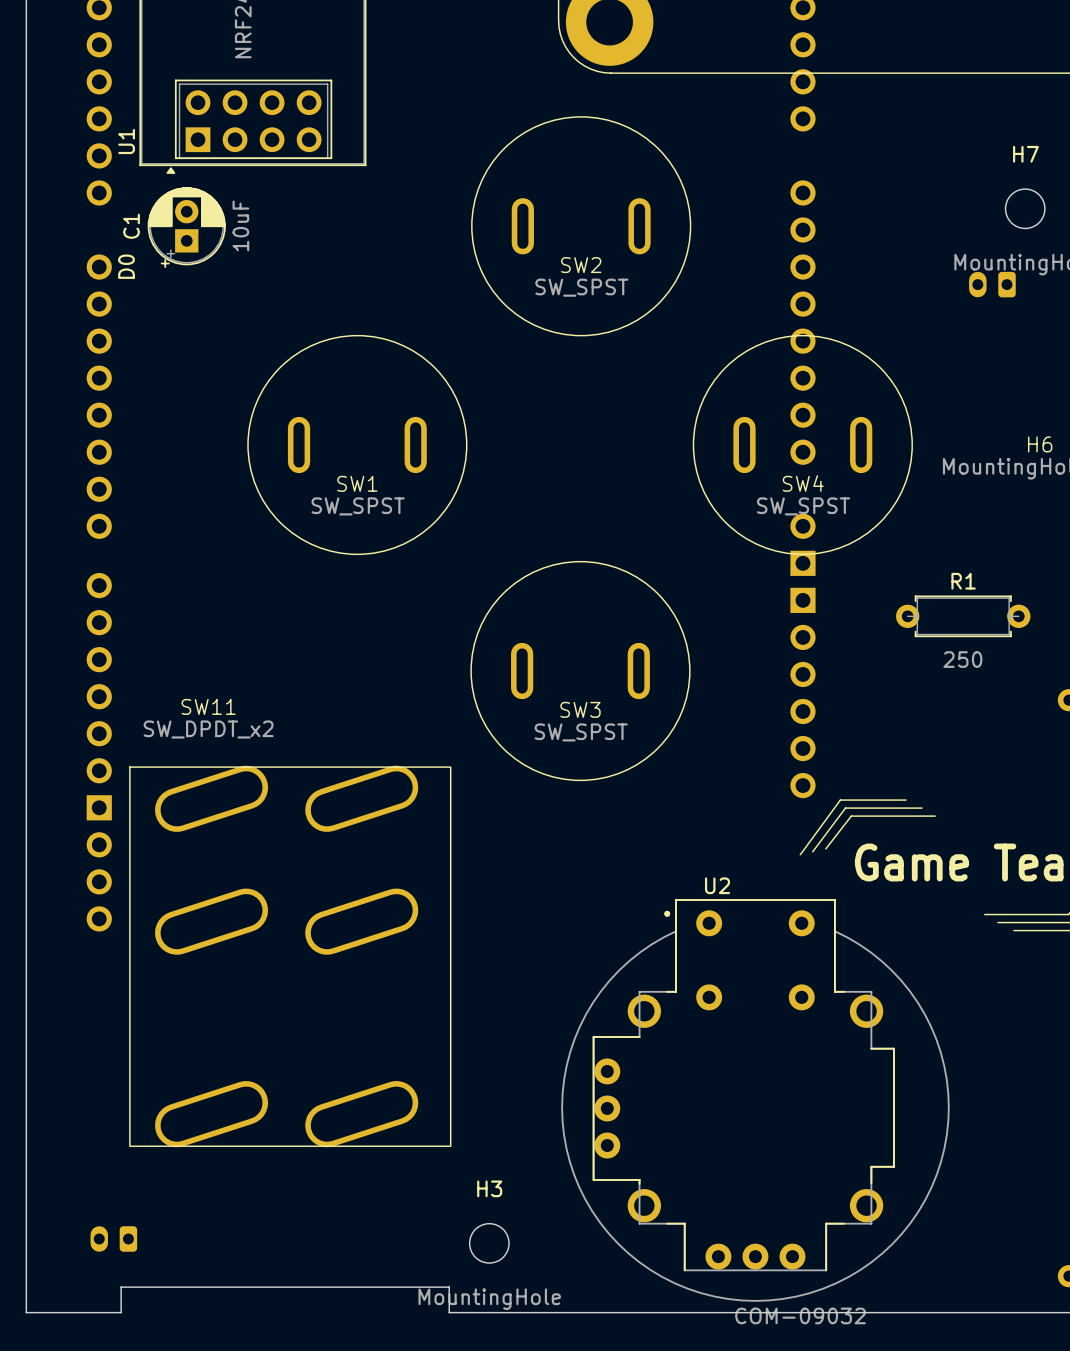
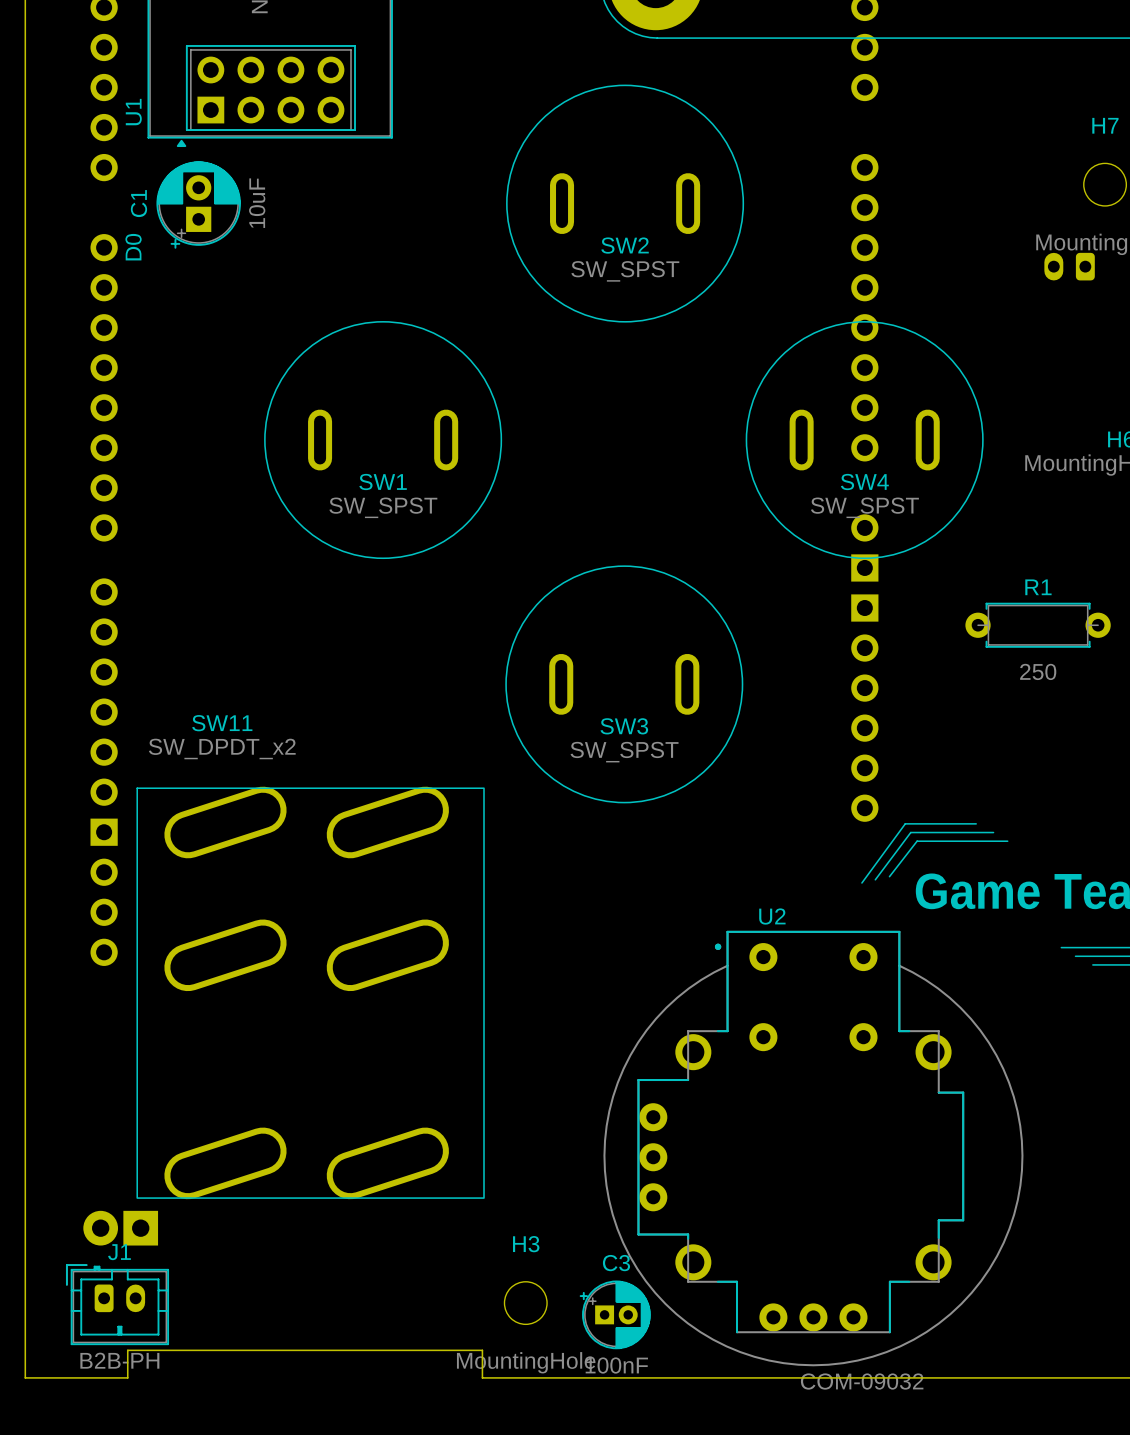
part: none -> (120, 1228)
part: (113, 1238) -> none
J1: none -> B2B-PH (117, 1304)
C3: none -> 100nF (615, 1314)

